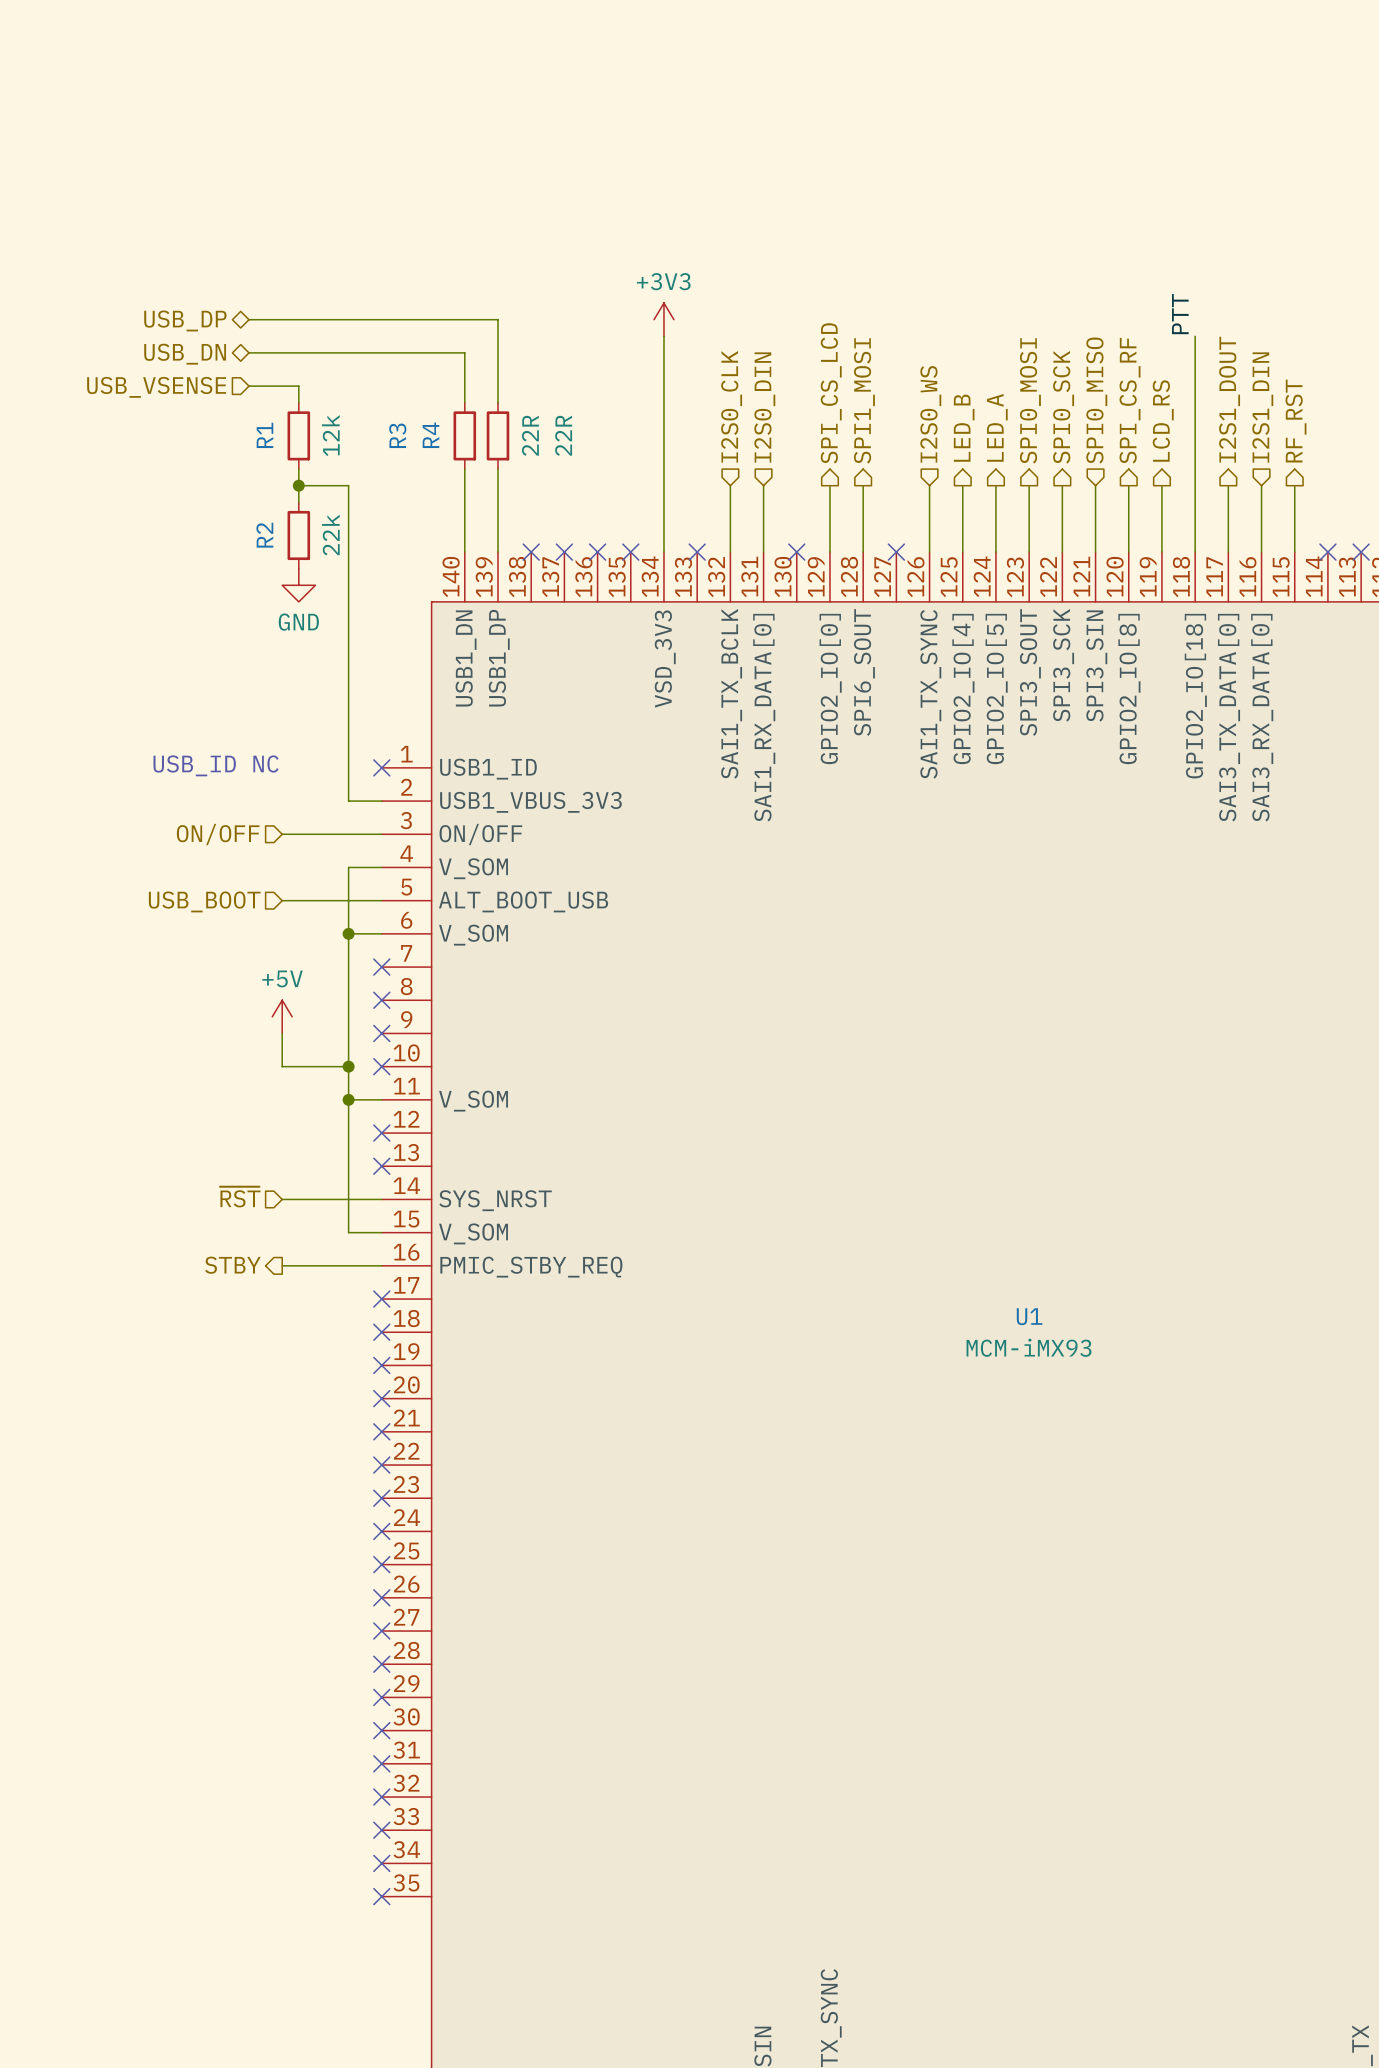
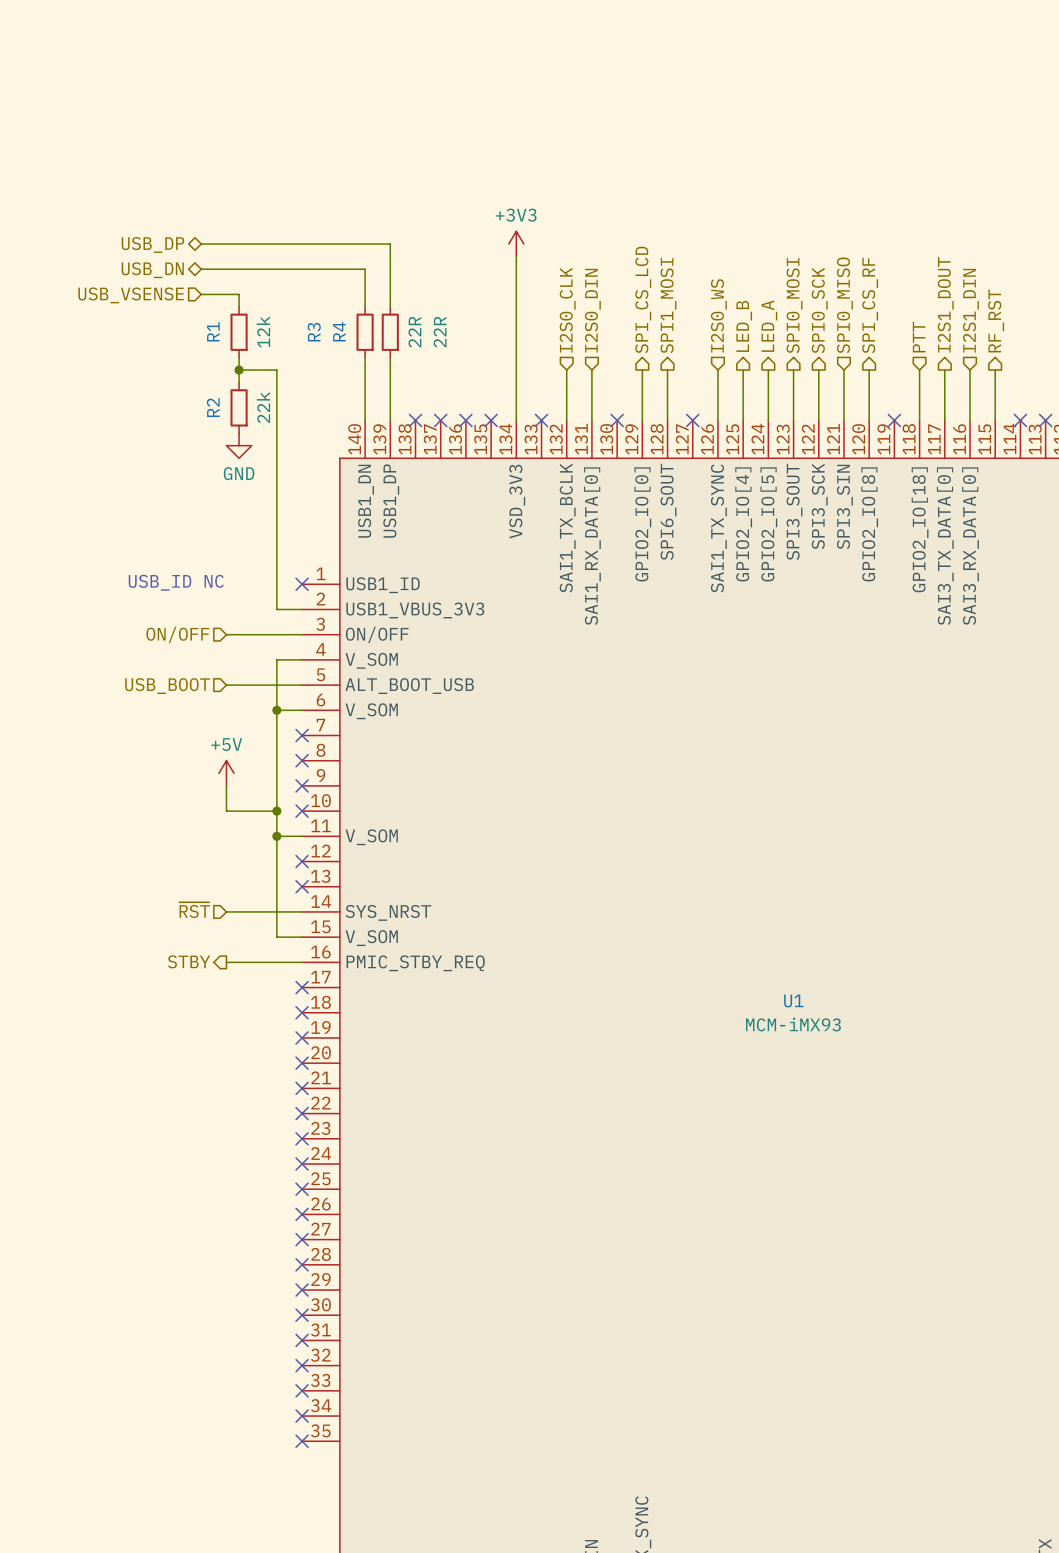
label: PTT (1180, 314) -> none
wire: (1195, 336) (1195, 485) -> none
hierarchical label: LCD_RS (1163, 421) -> none
hierarchical label: none -> PTT (919, 337)
wire: (1161, 485) (1161, 552) -> none
no-connect mark: none -> (894, 420)

